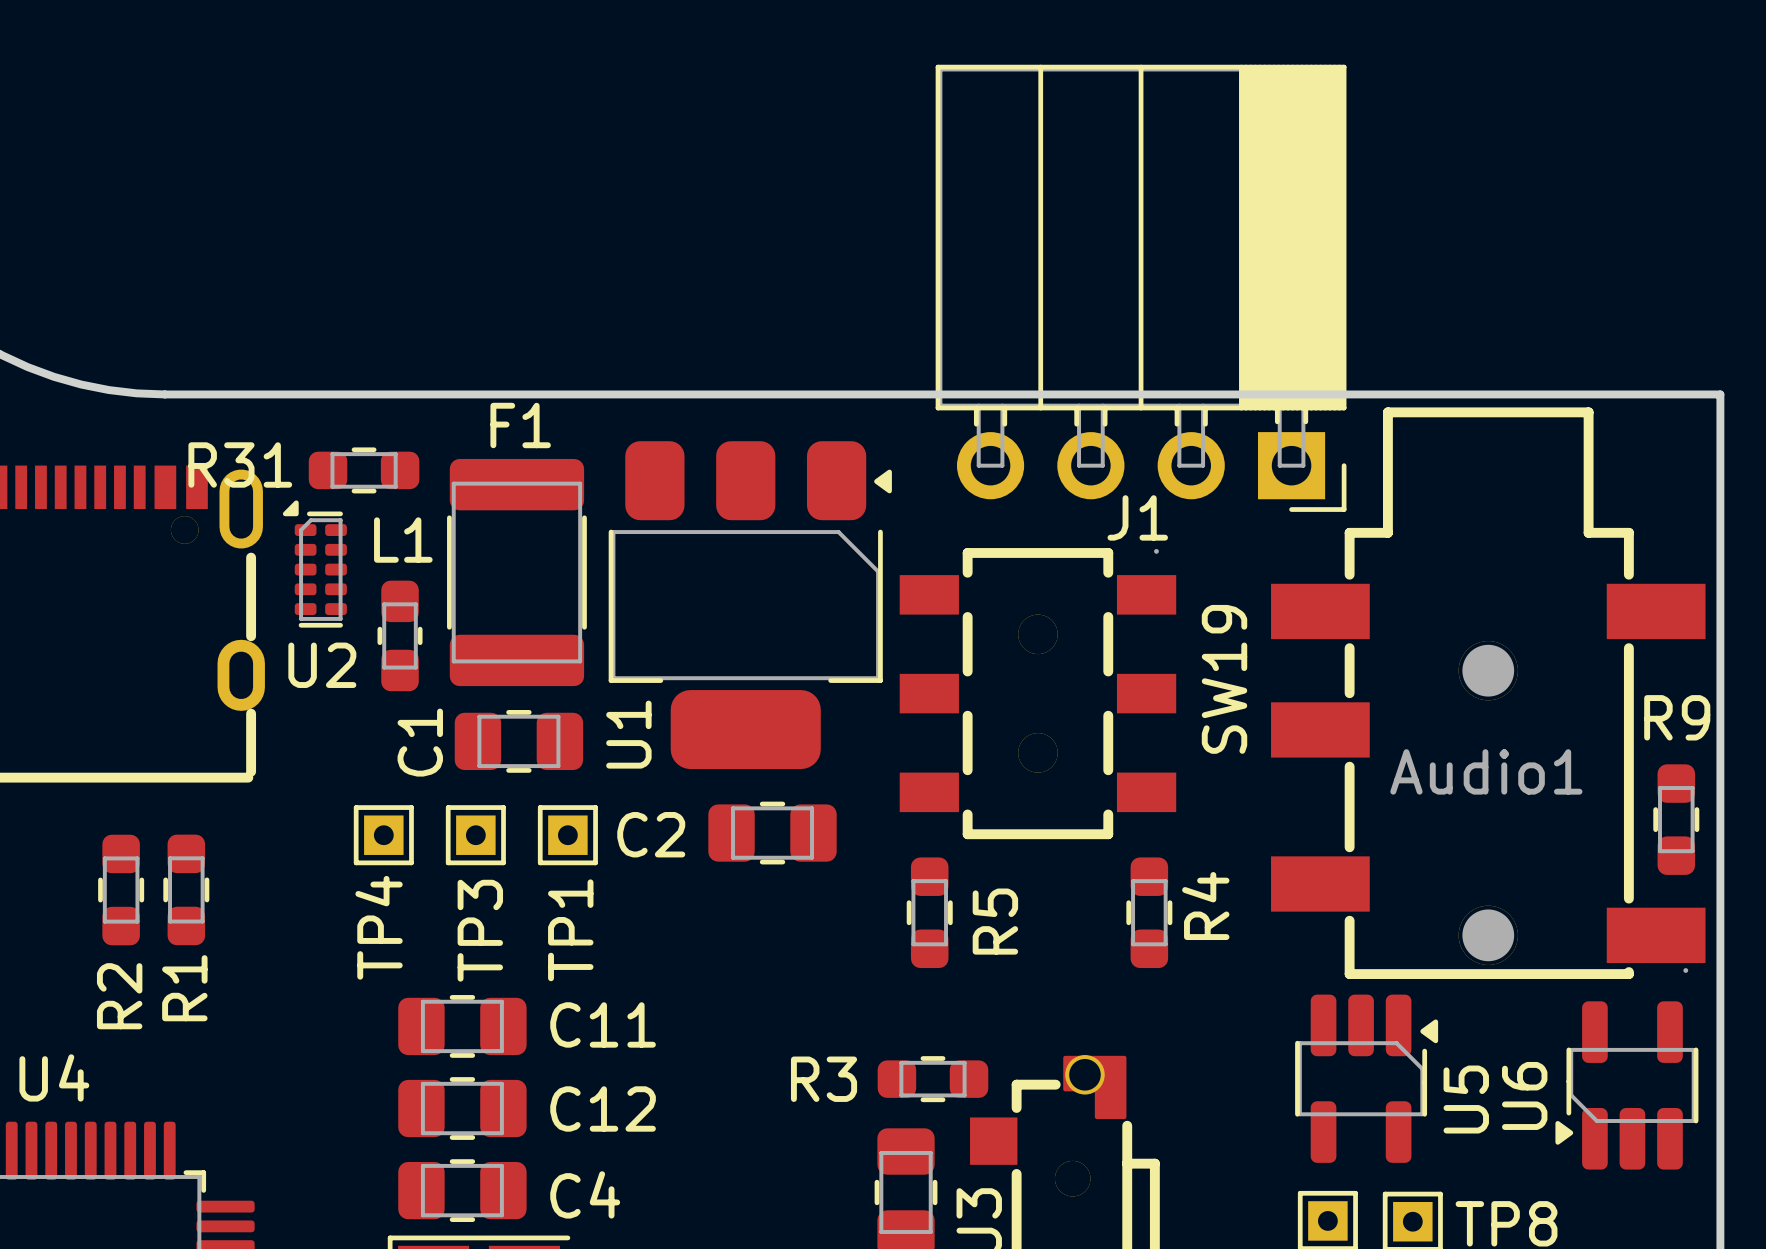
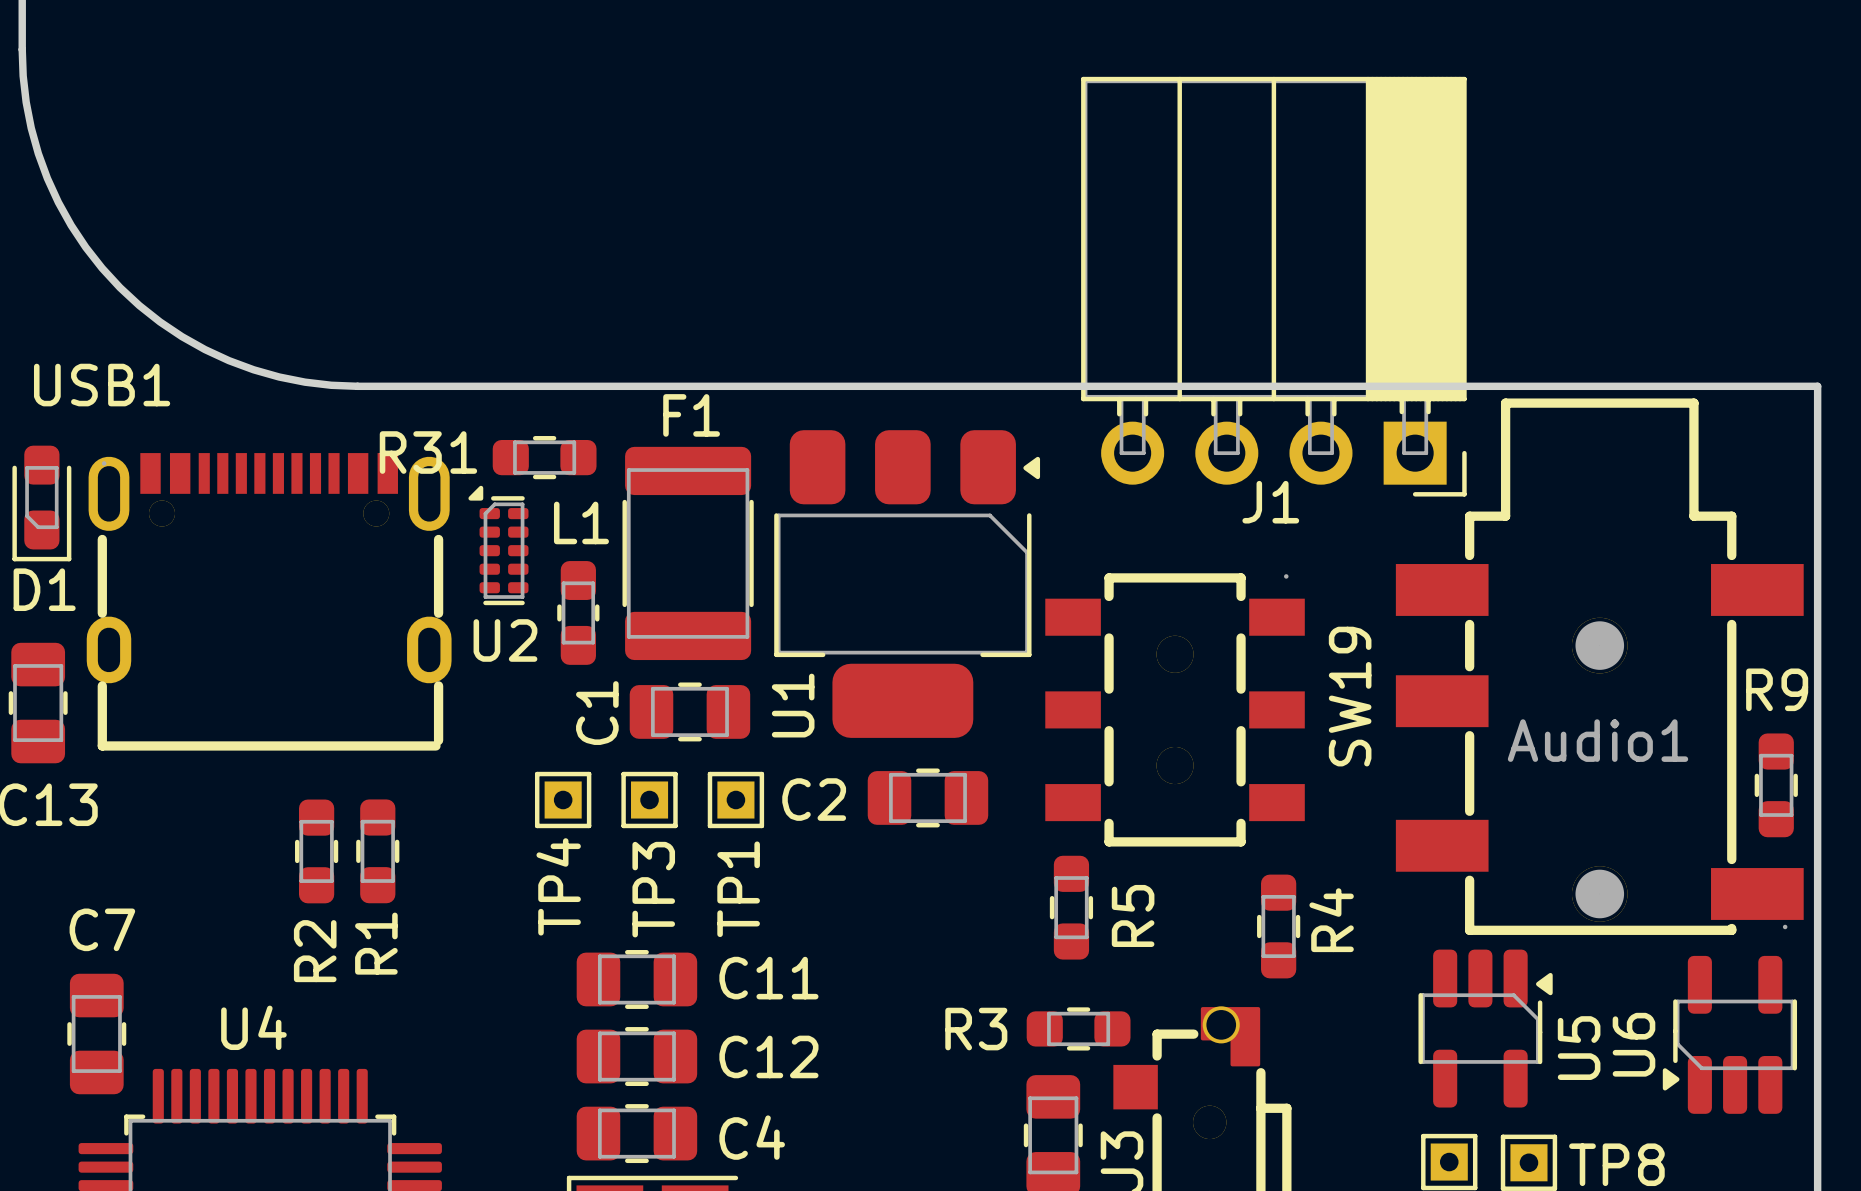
SW19 position: (1037, 693) -> (1175, 709)
R5 position: (929, 912) -> (1071, 907)
R4 position: (1149, 912) -> (1278, 926)

